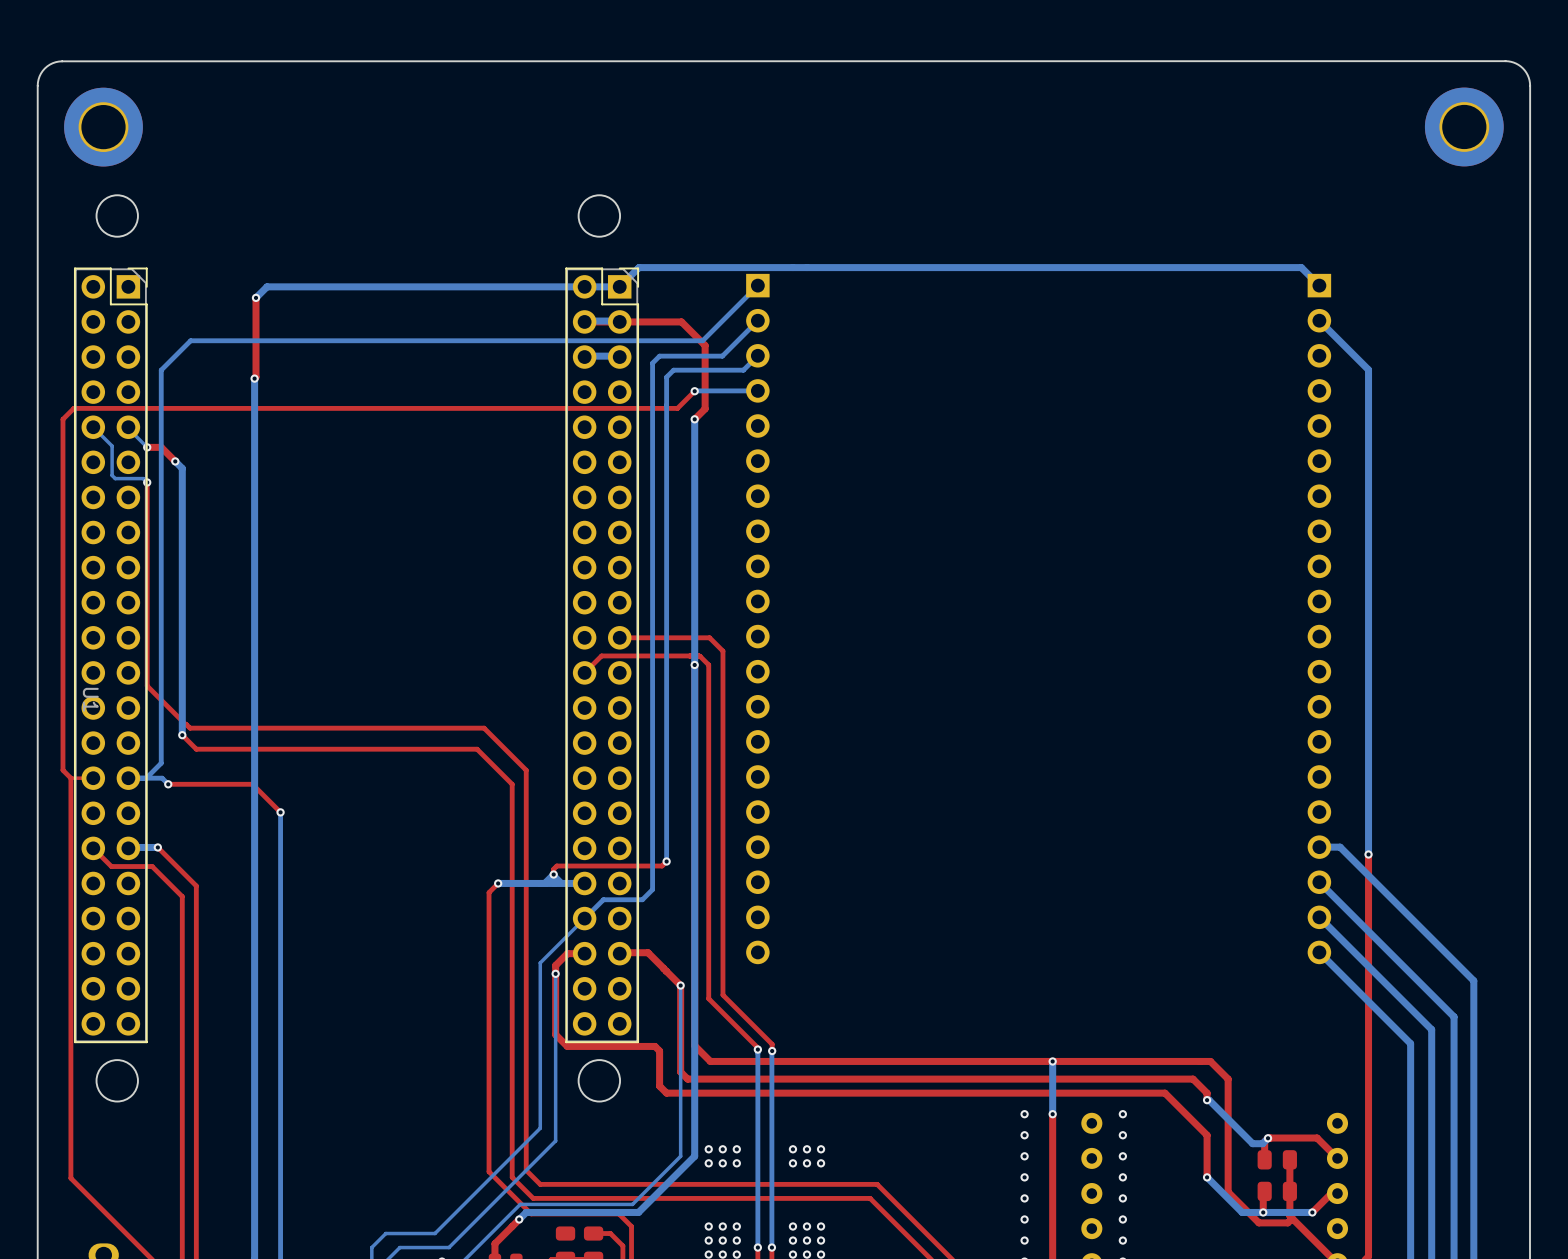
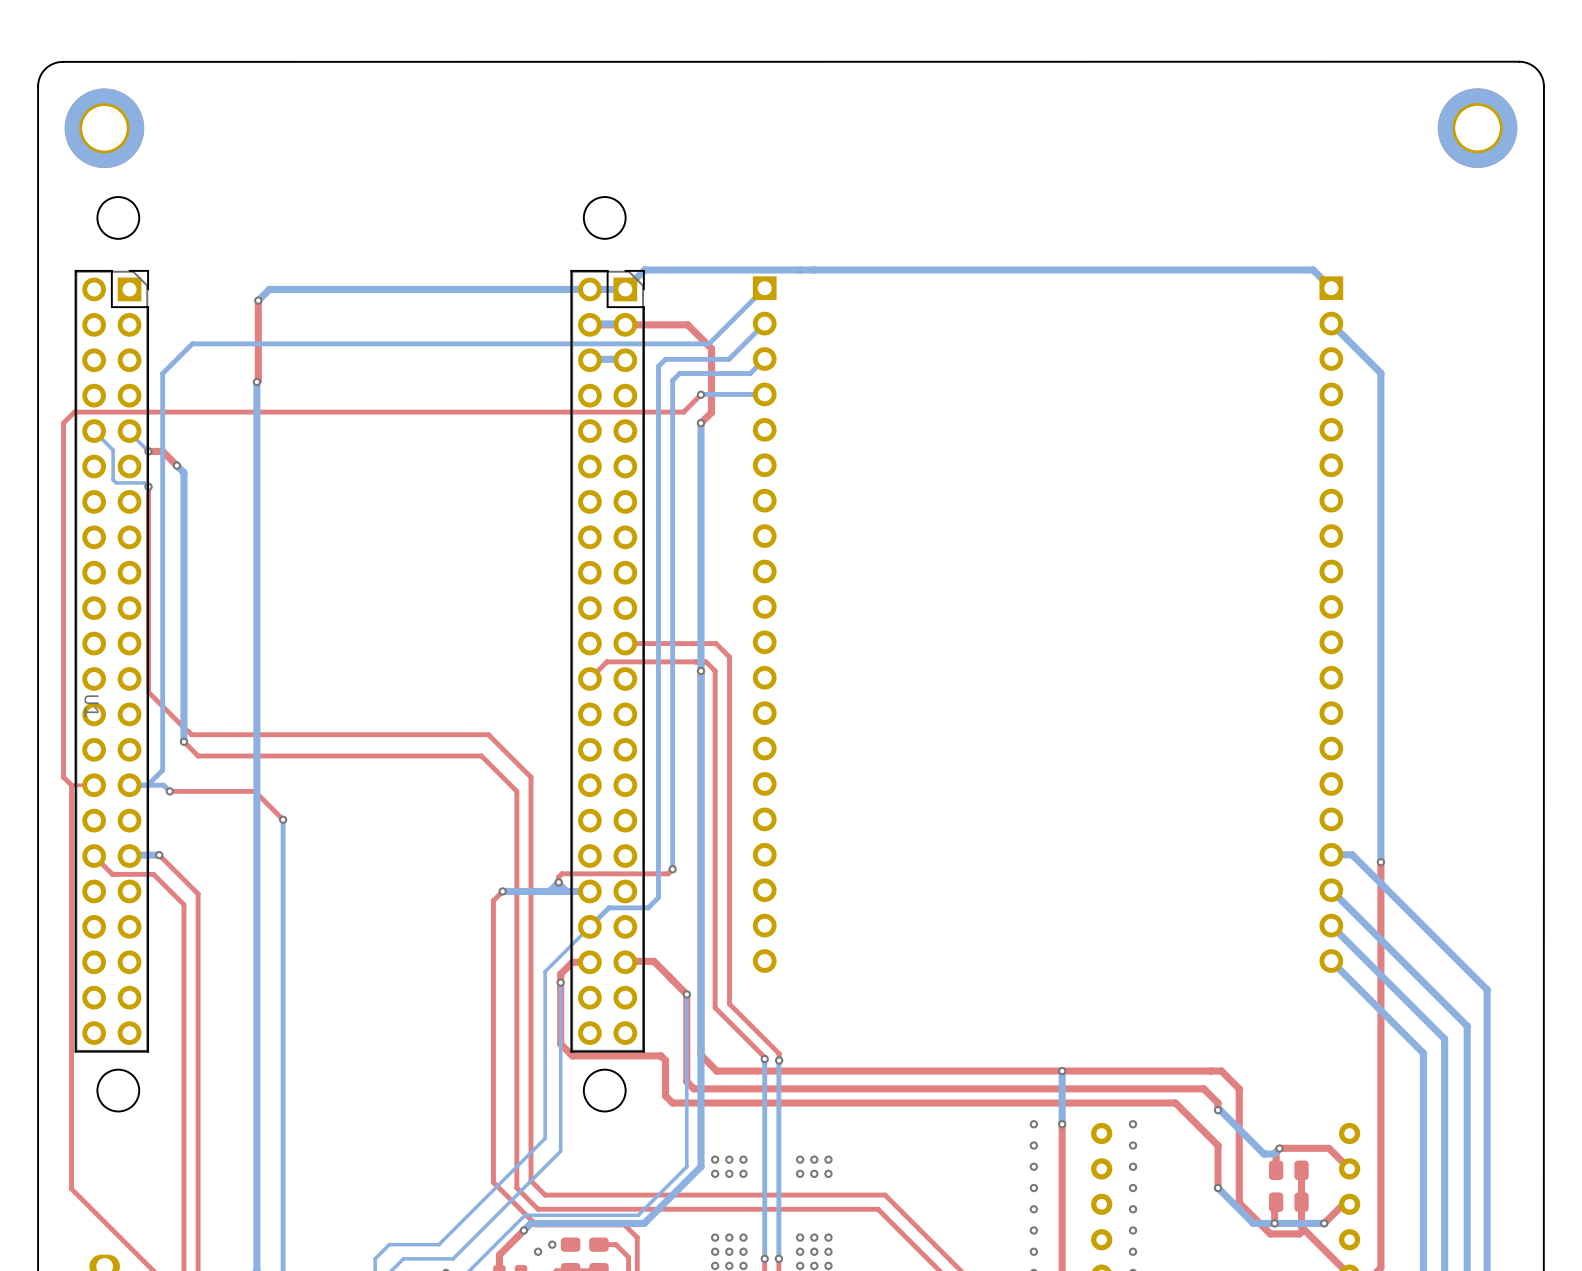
via: none -> (552, 1244)
via: none -> (538, 1251)

